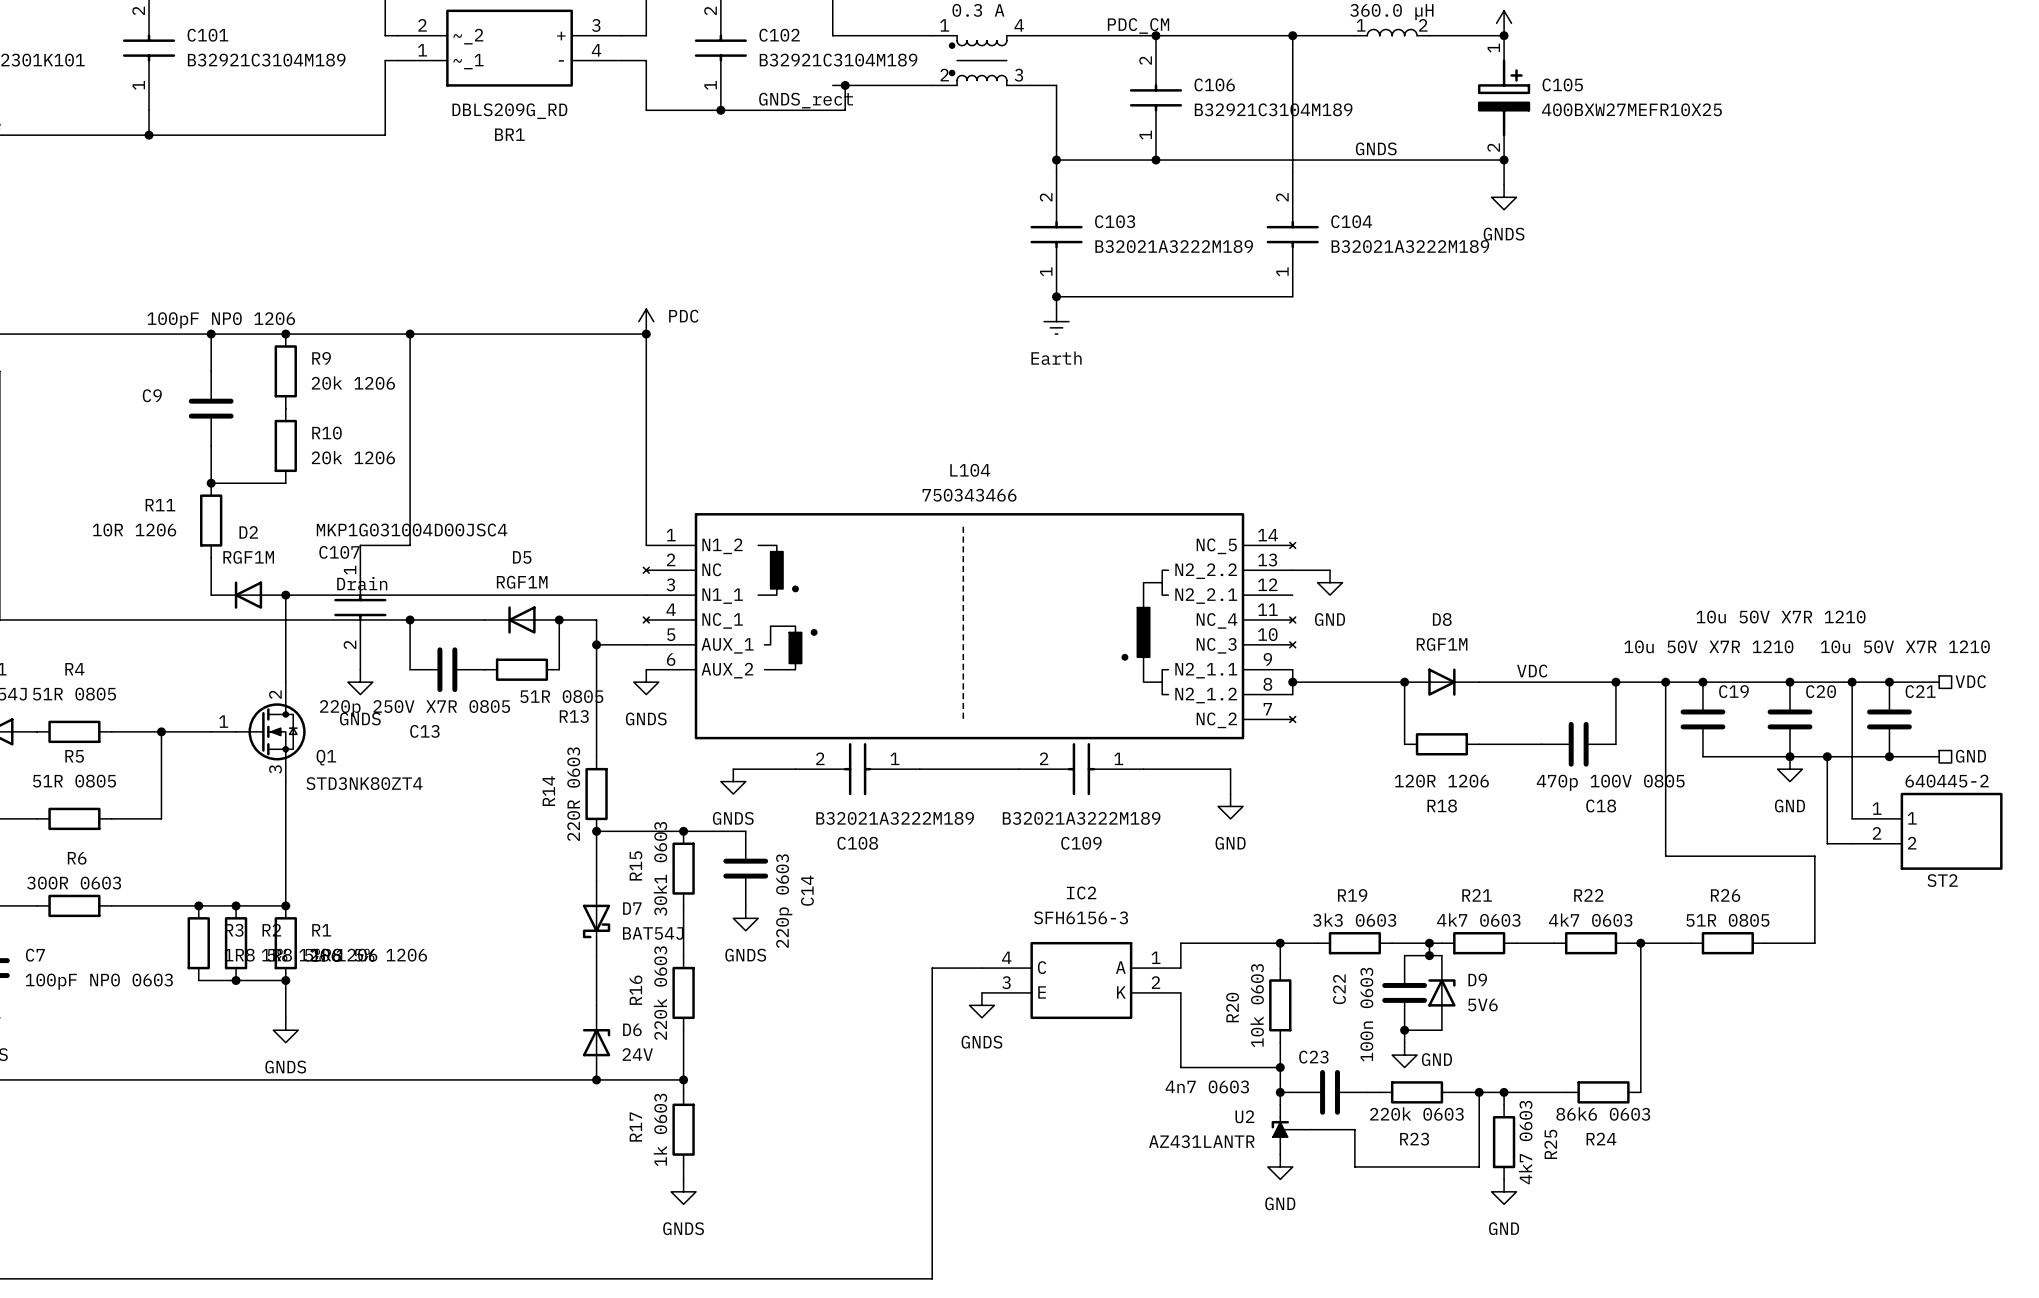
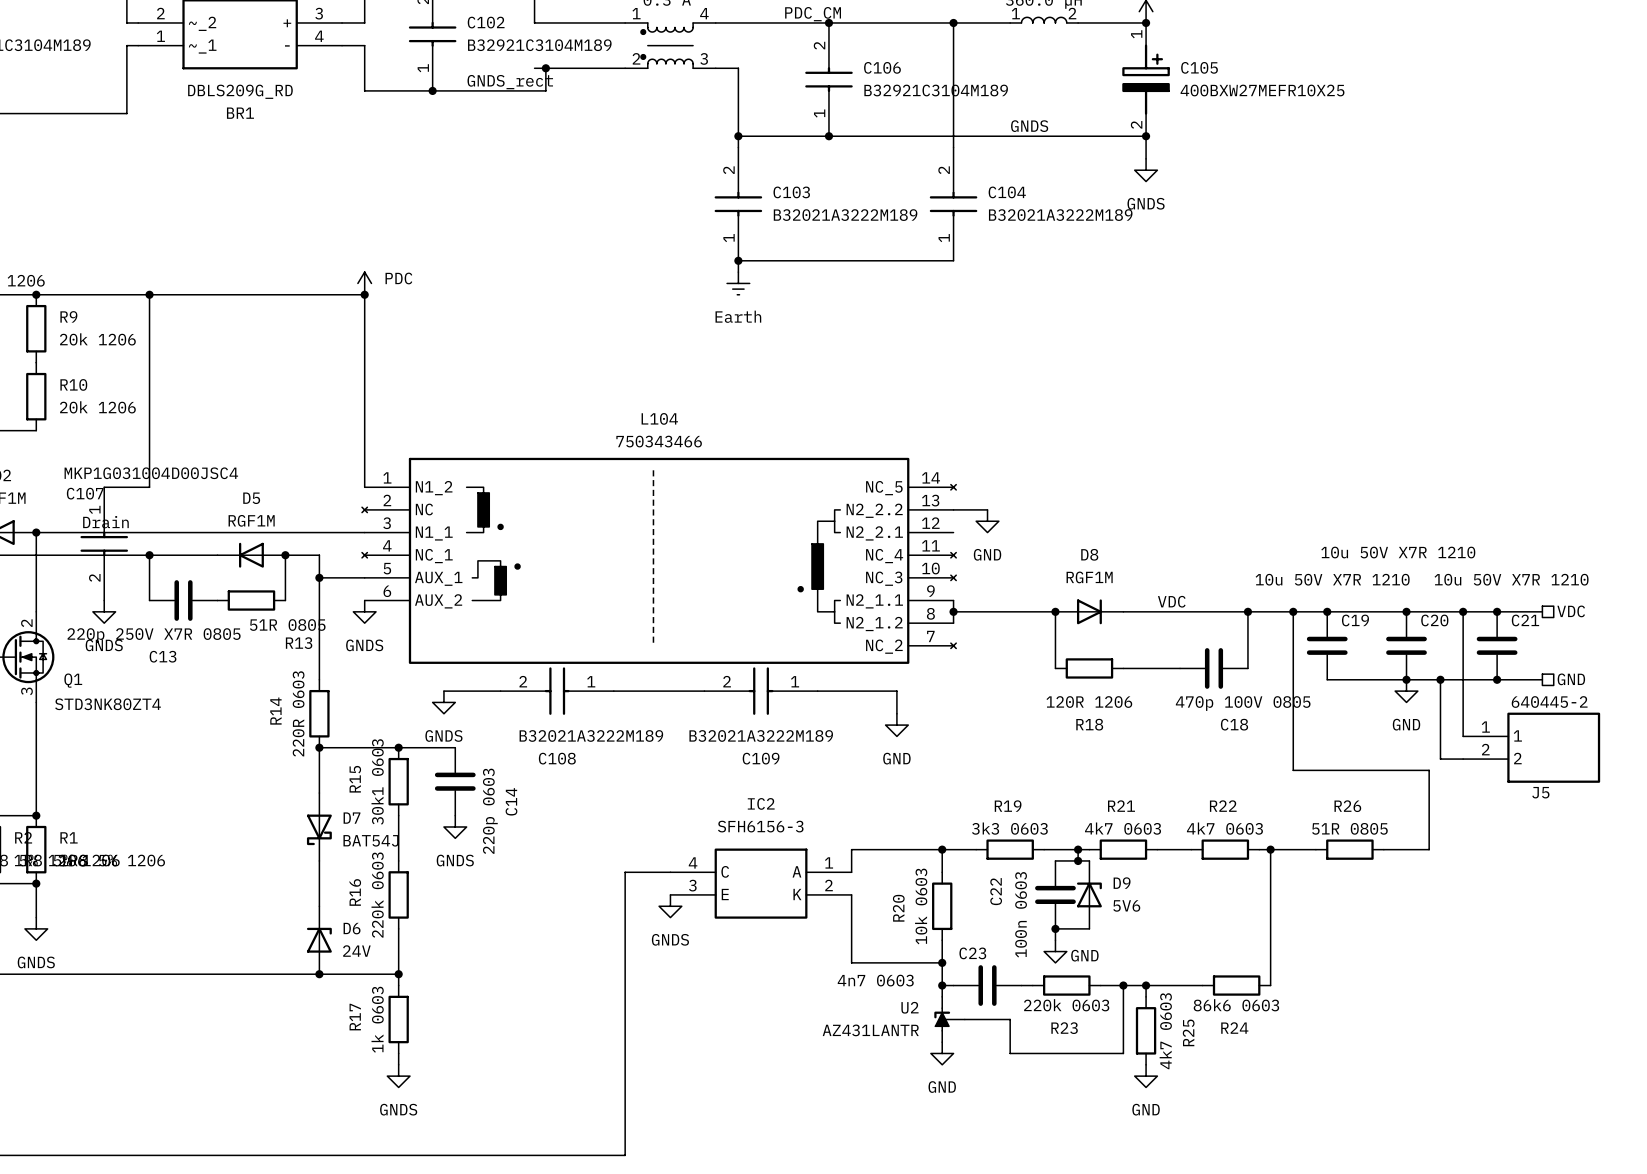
ST2 name: ST2 (1942, 880) -> J5 (1540, 792)

